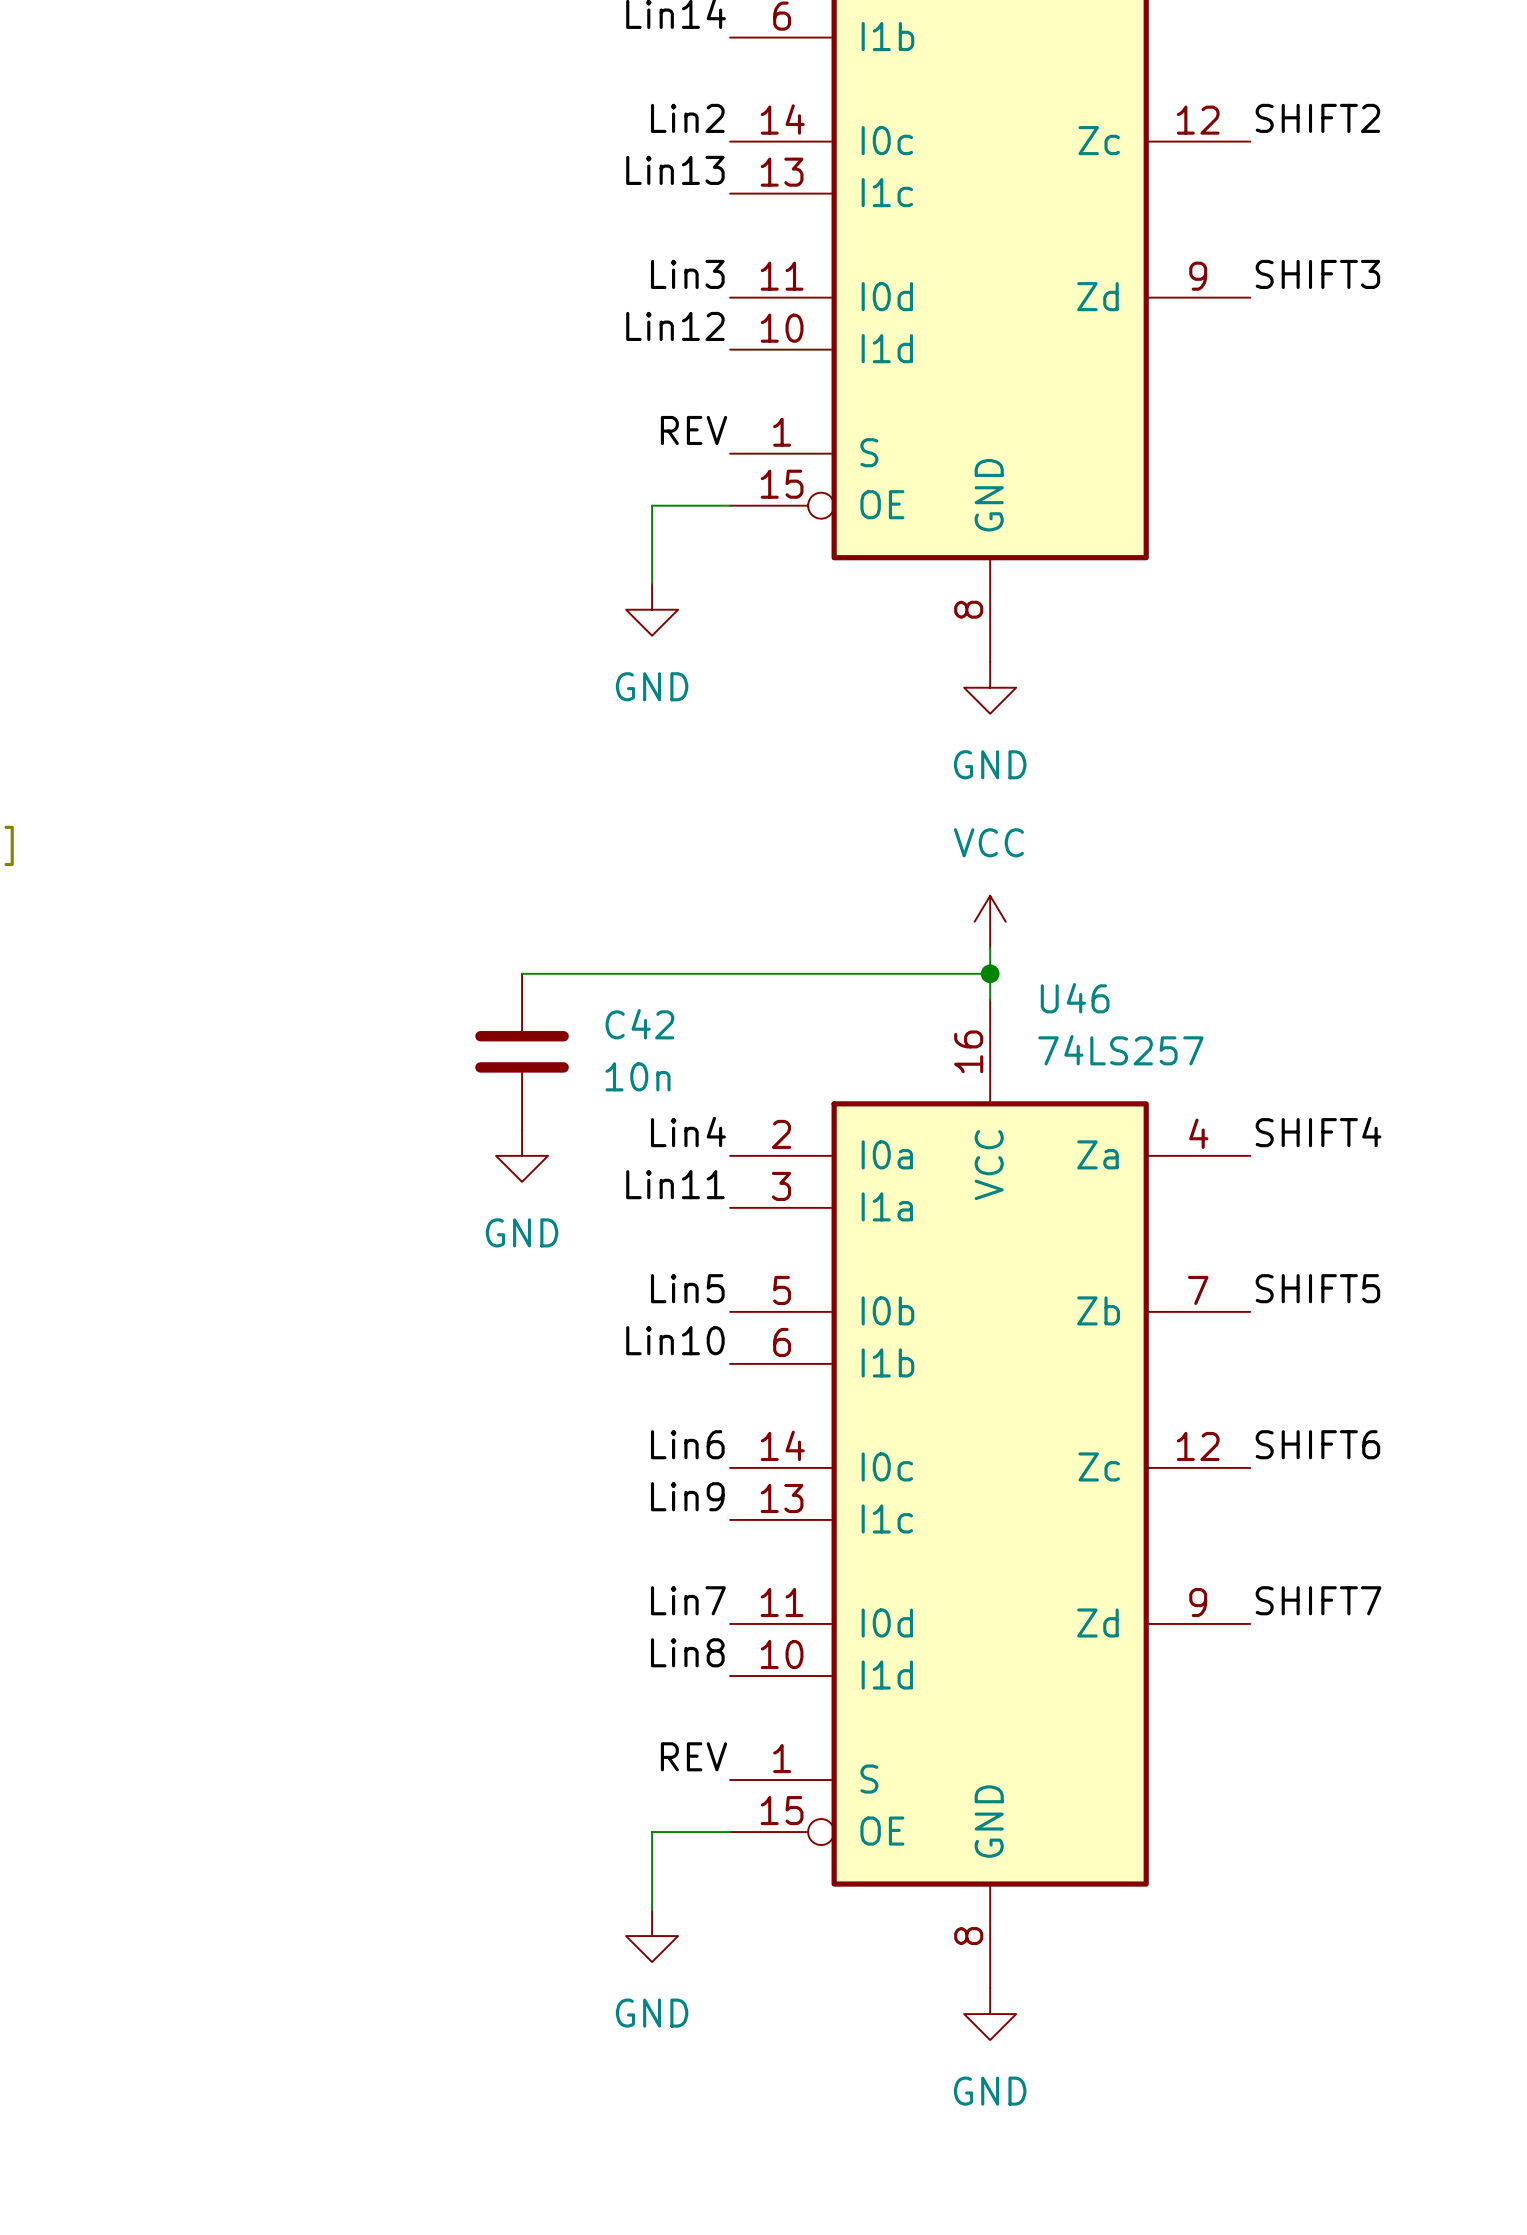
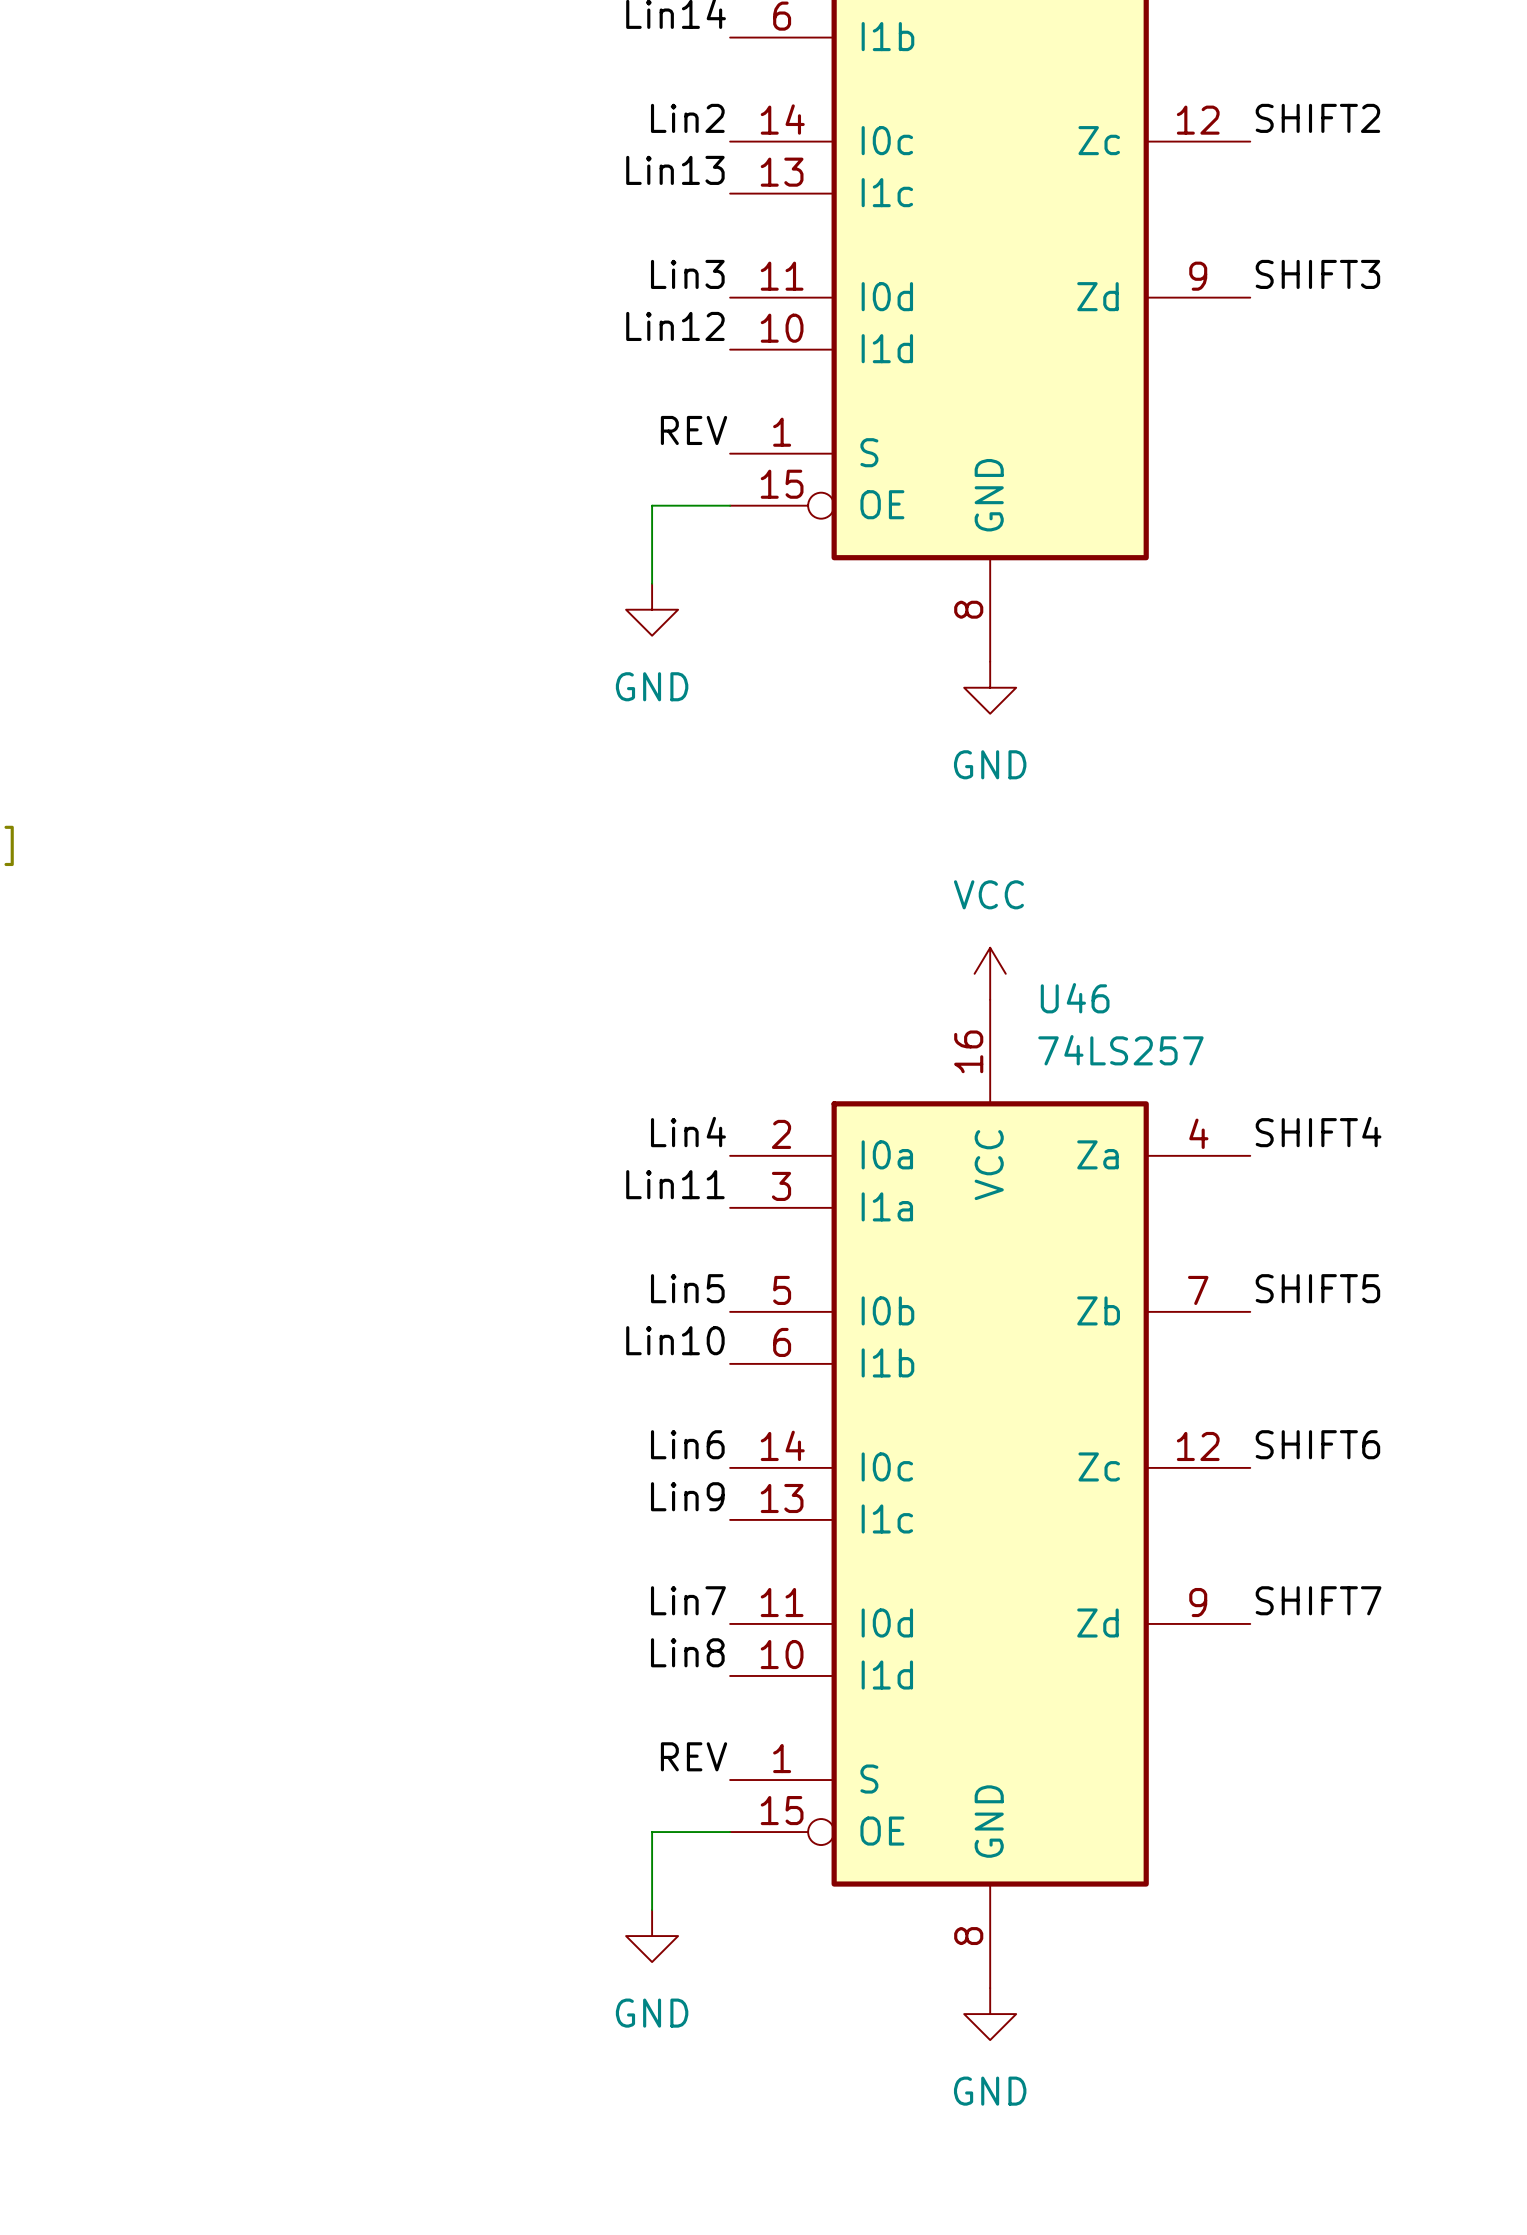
power symbol position: VCC (990, 921) -> VCC (990, 973)
wire: (522, 973) (990, 973) -> none
junction: (990, 973) -> none
C42: 10n (522, 1051) -> none
power symbol: GND (522, 1155) -> none

